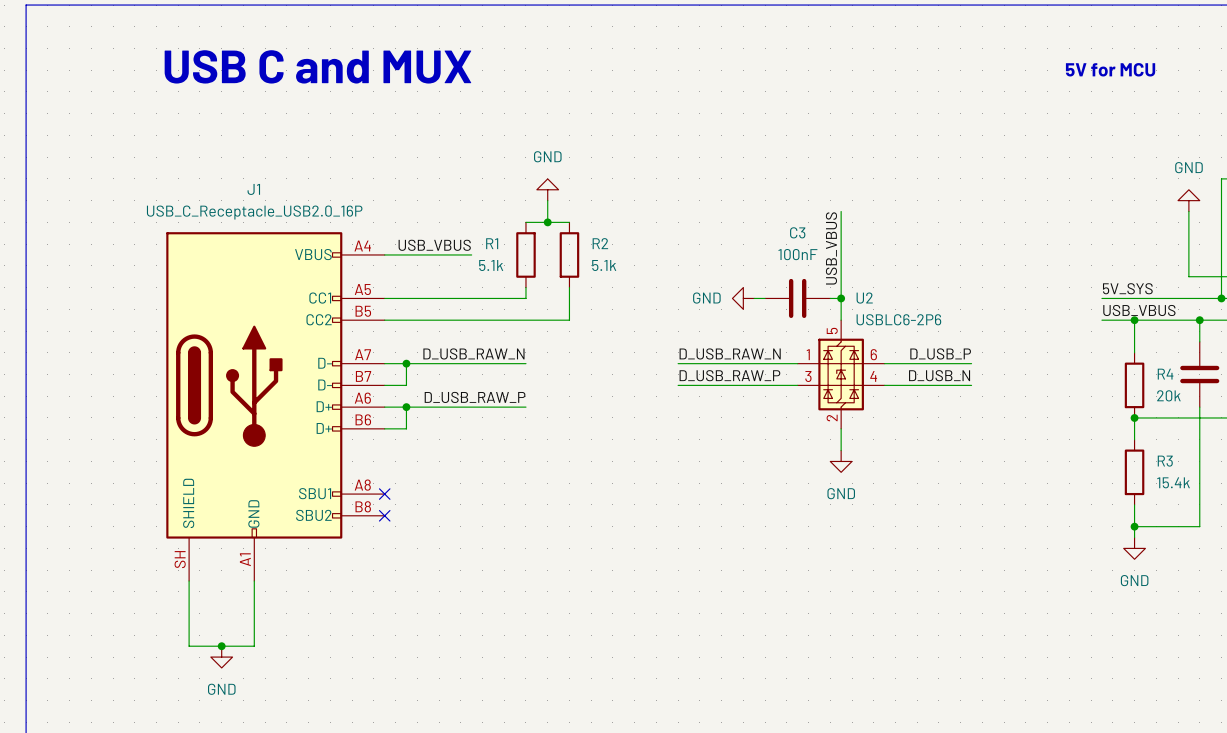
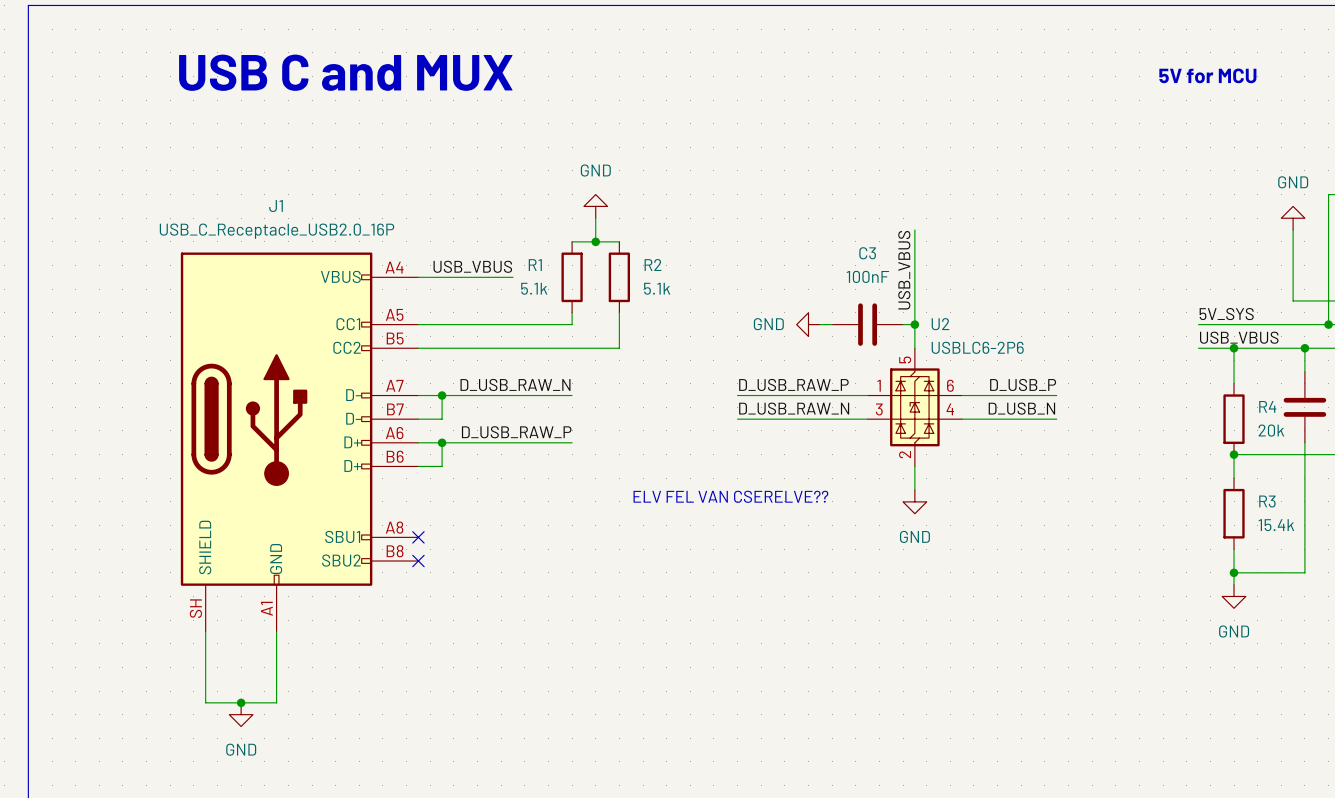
label: D_USB_RAW_N (730, 353) -> D_USB_RAW_P (793, 384)
label: D_USB_RAW_P (729, 375) -> D_USB_RAW_N (794, 408)
text: none -> ELV FEL VAN CSERELVE?? (730, 496)

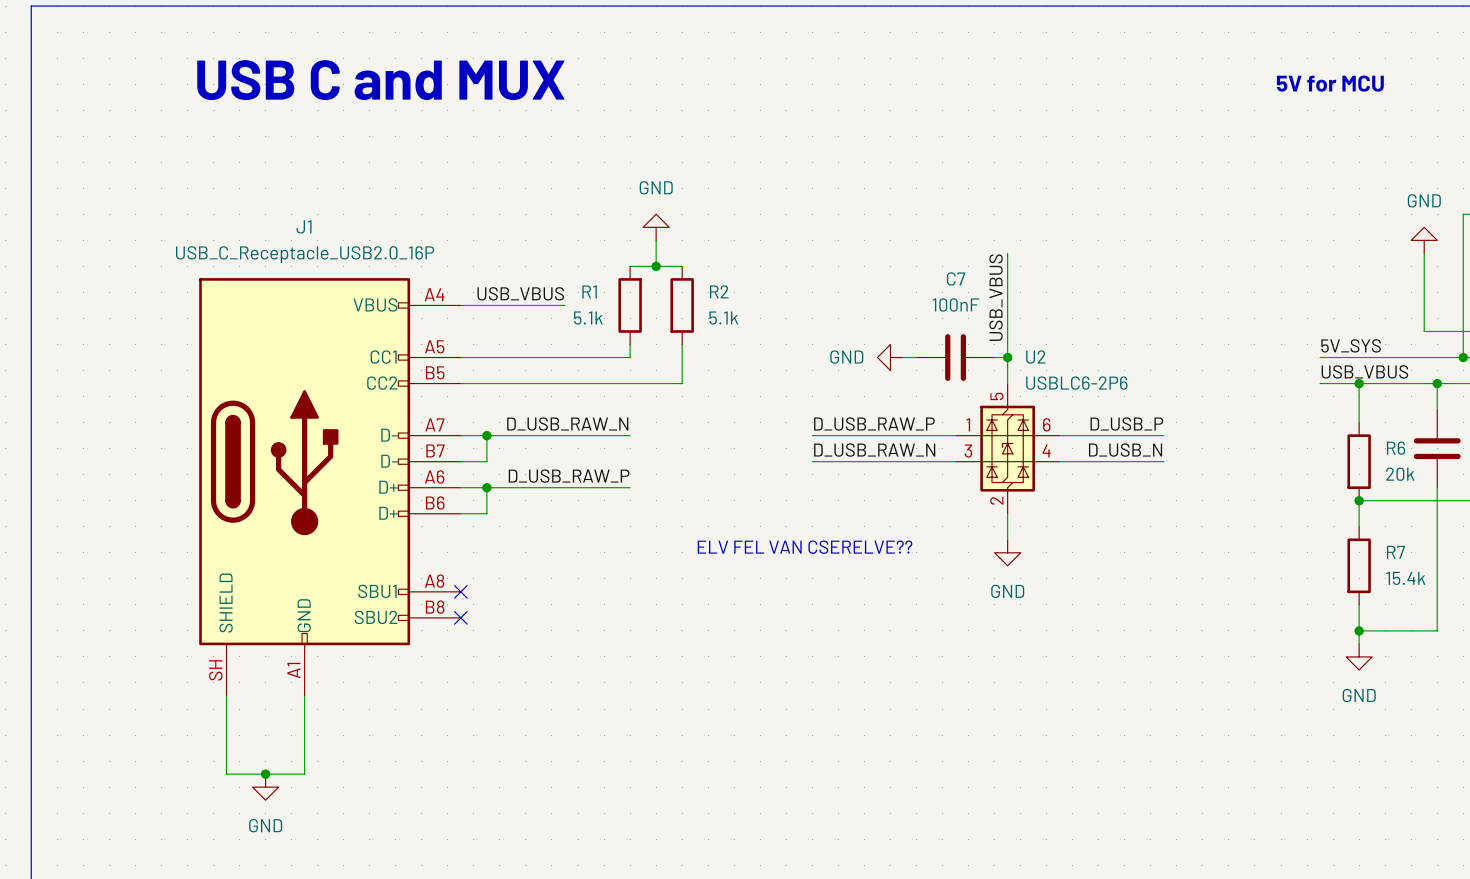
C3 name: C3 (867, 253) -> C7 (956, 278)
R4 name: R4 (1267, 406) -> R6 (1396, 448)
R3 name: R3 (1267, 501) -> R7 (1395, 552)

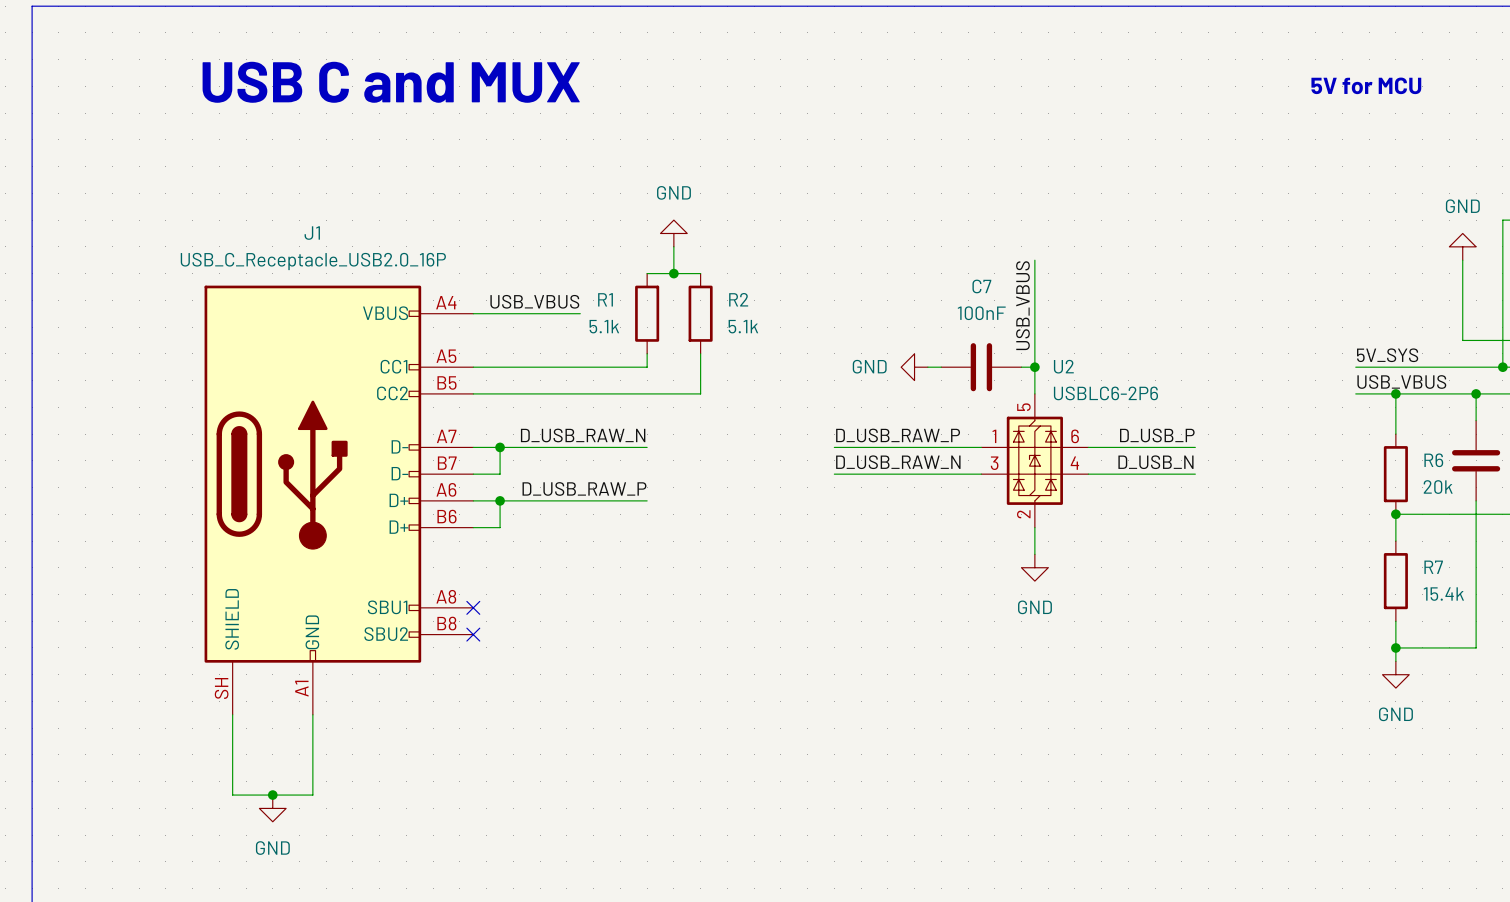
text: ELV FEL VAN CSERELVE?? (805, 547) -> none

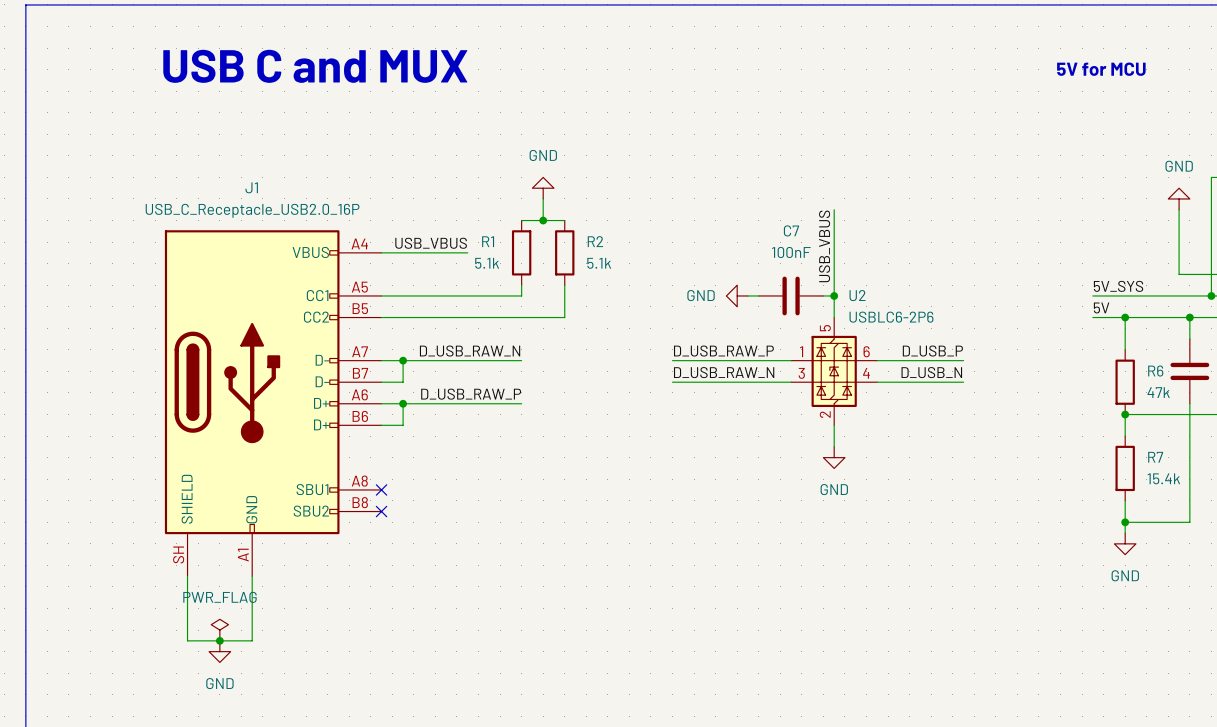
label: USB_VBUS (1401, 382) -> 5V (1101, 307)
R6 value: 20k (1438, 487) -> 47k (1158, 392)
power symbol: none -> PWR_FLAG (219, 630)

